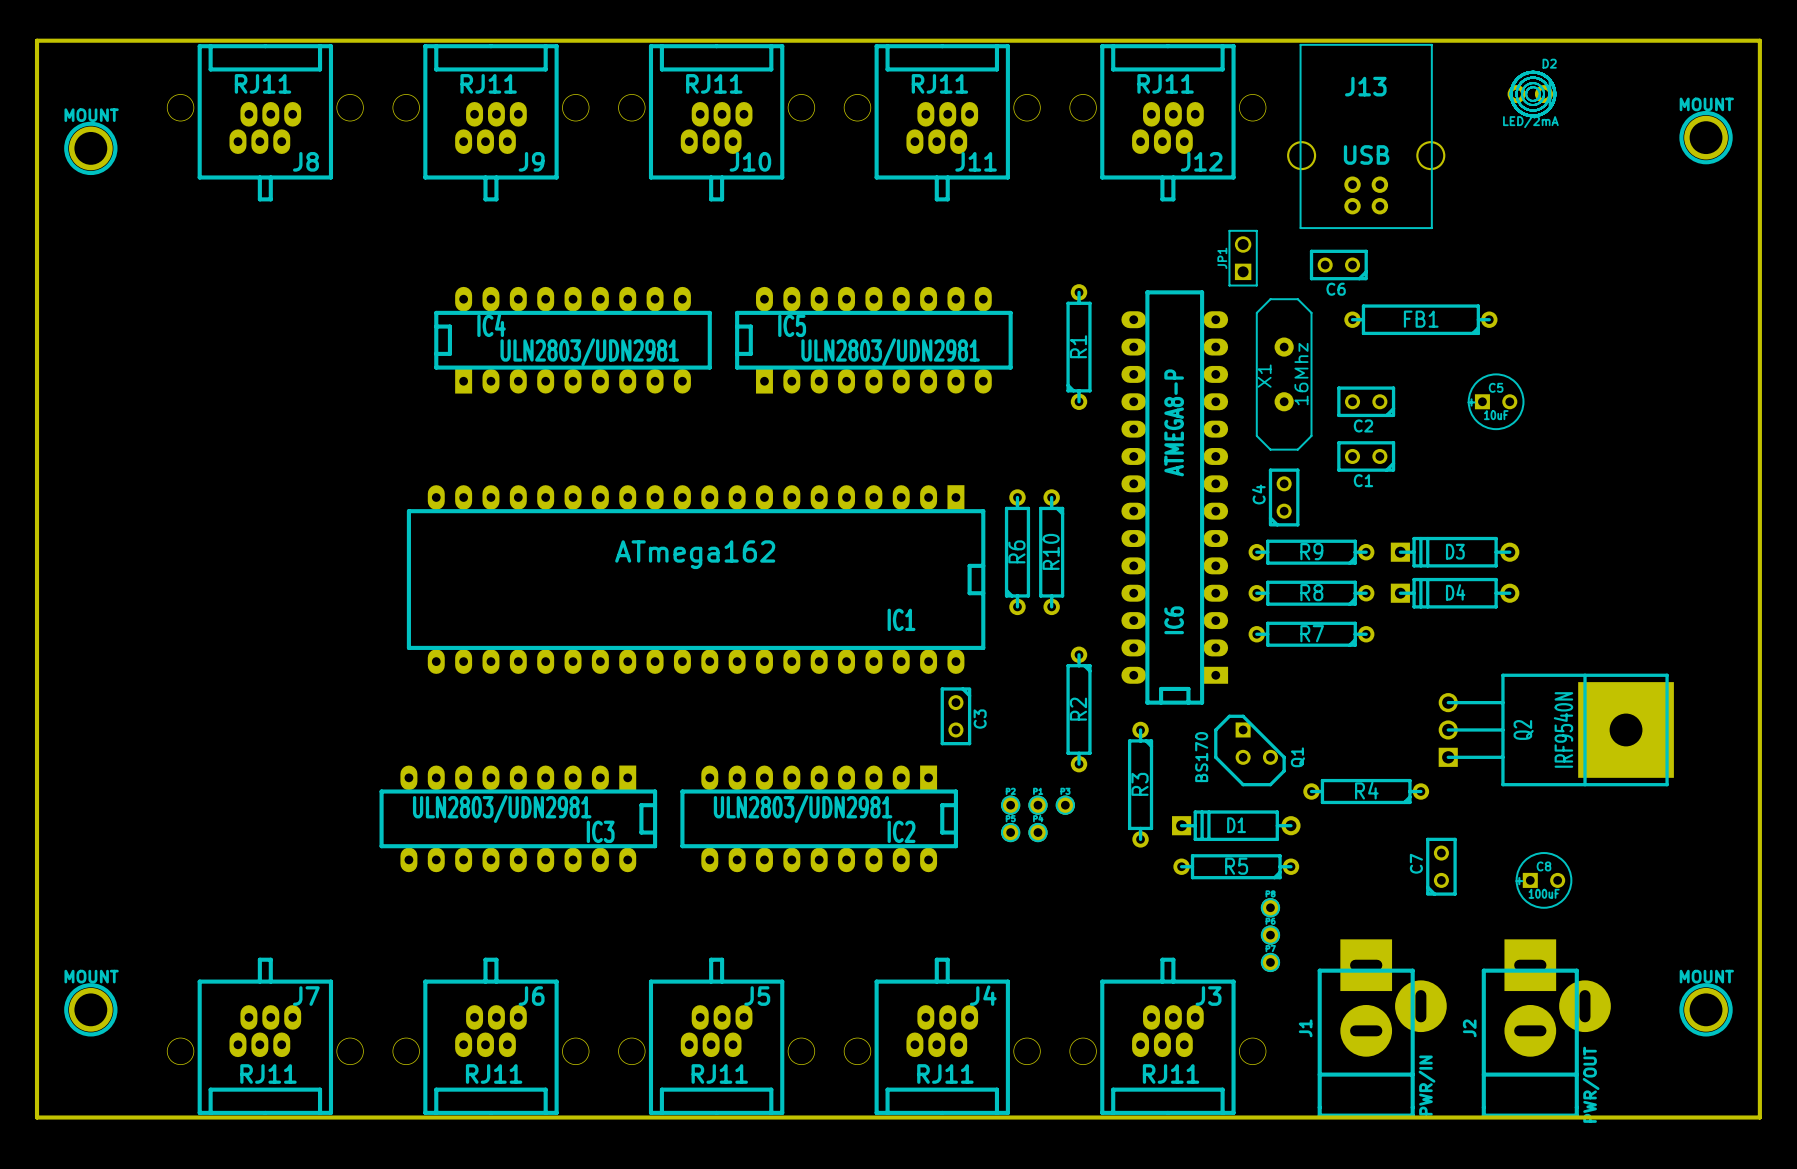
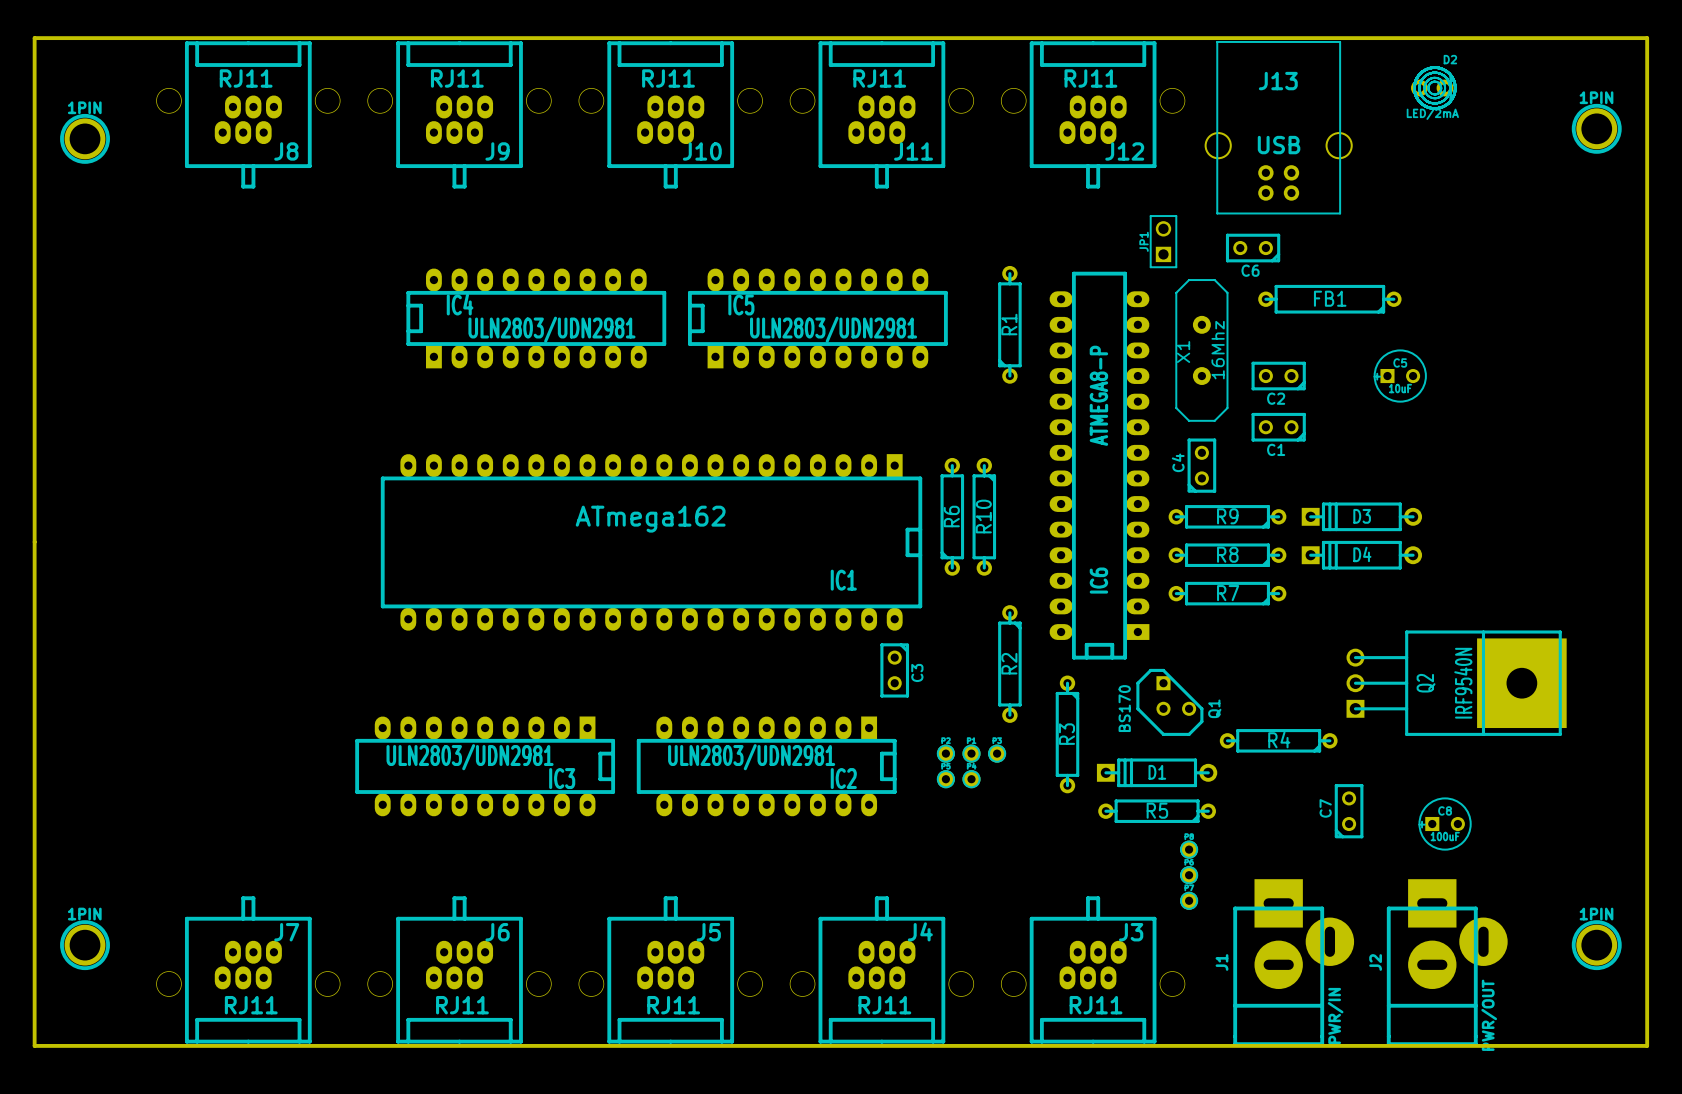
MOUNT name: MOUNT (1706, 104) -> 1PIN (1596, 97)
MOUNT name: MOUNT (91, 115) -> 1PIN (84, 107)
MOUNT name: MOUNT (91, 976) -> 1PIN (84, 914)
MOUNT name: MOUNT (1706, 976) -> 1PIN (1596, 914)

